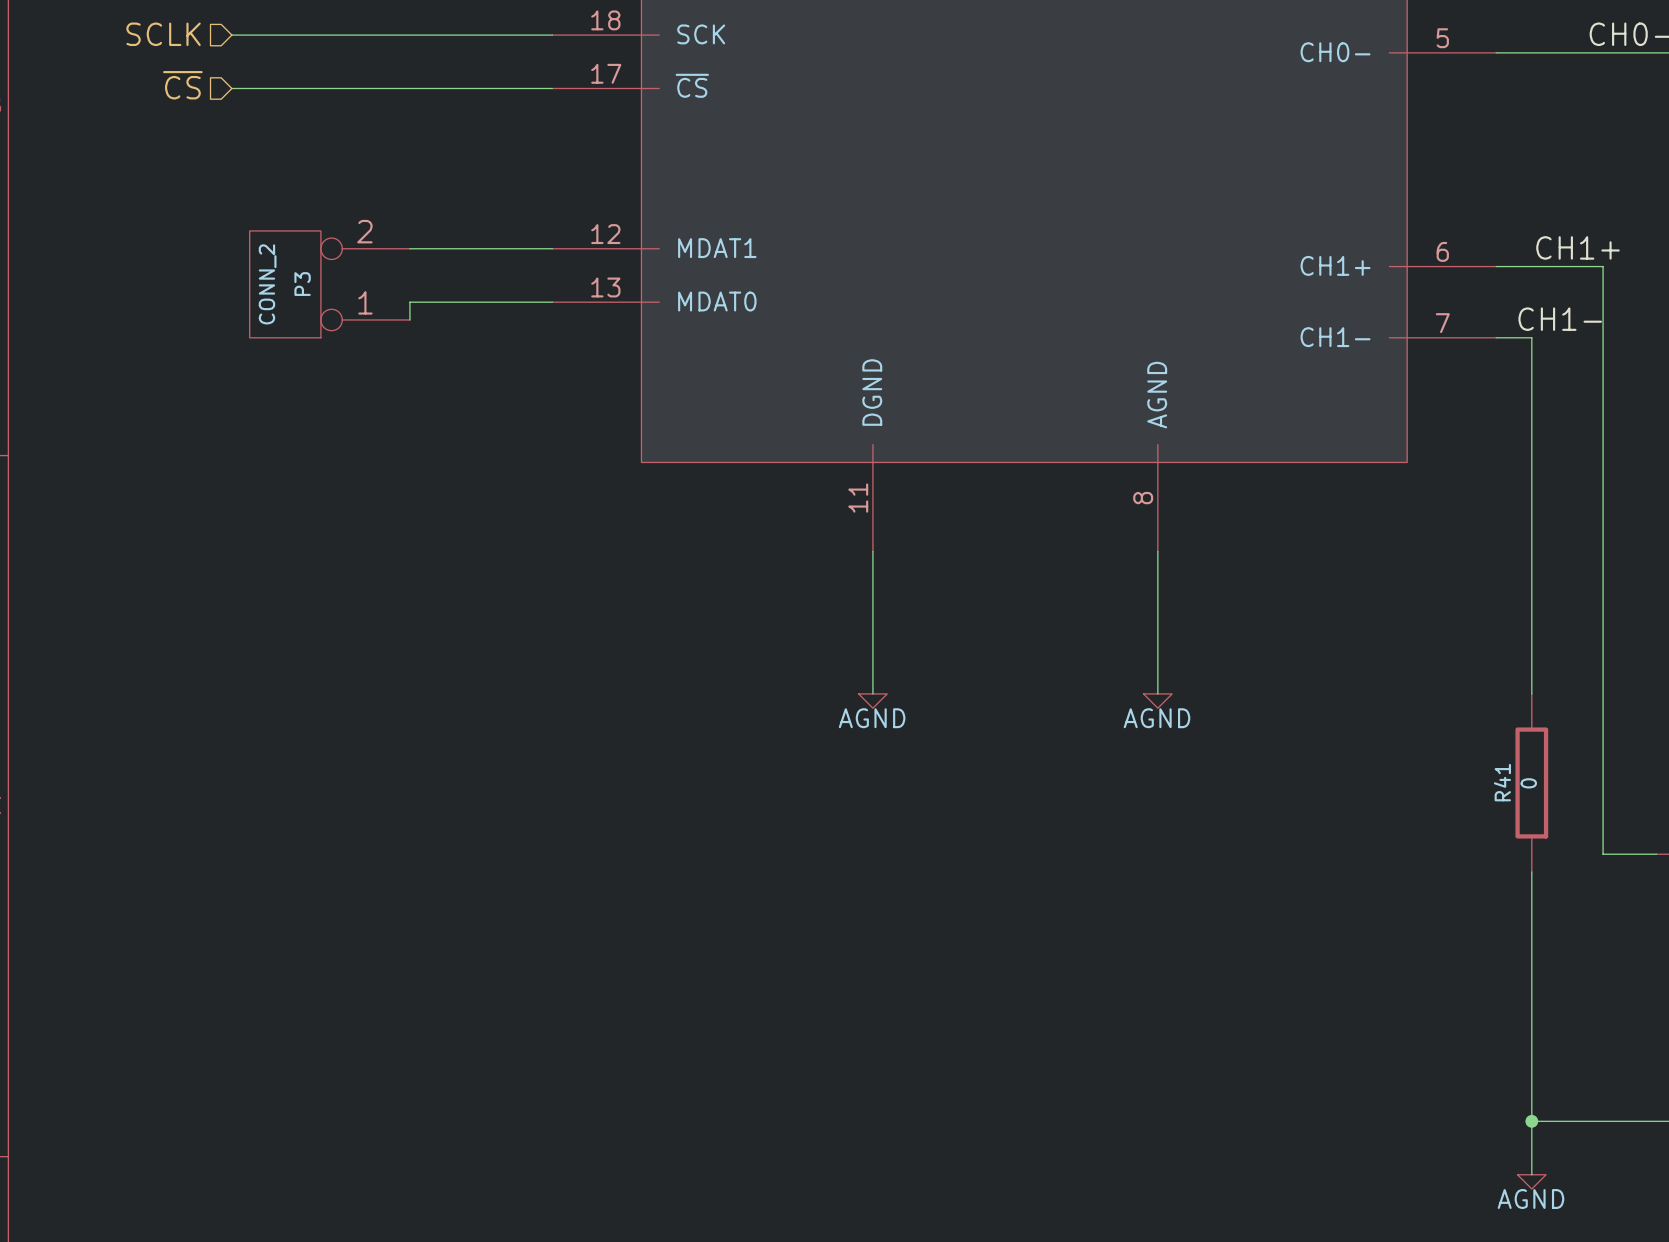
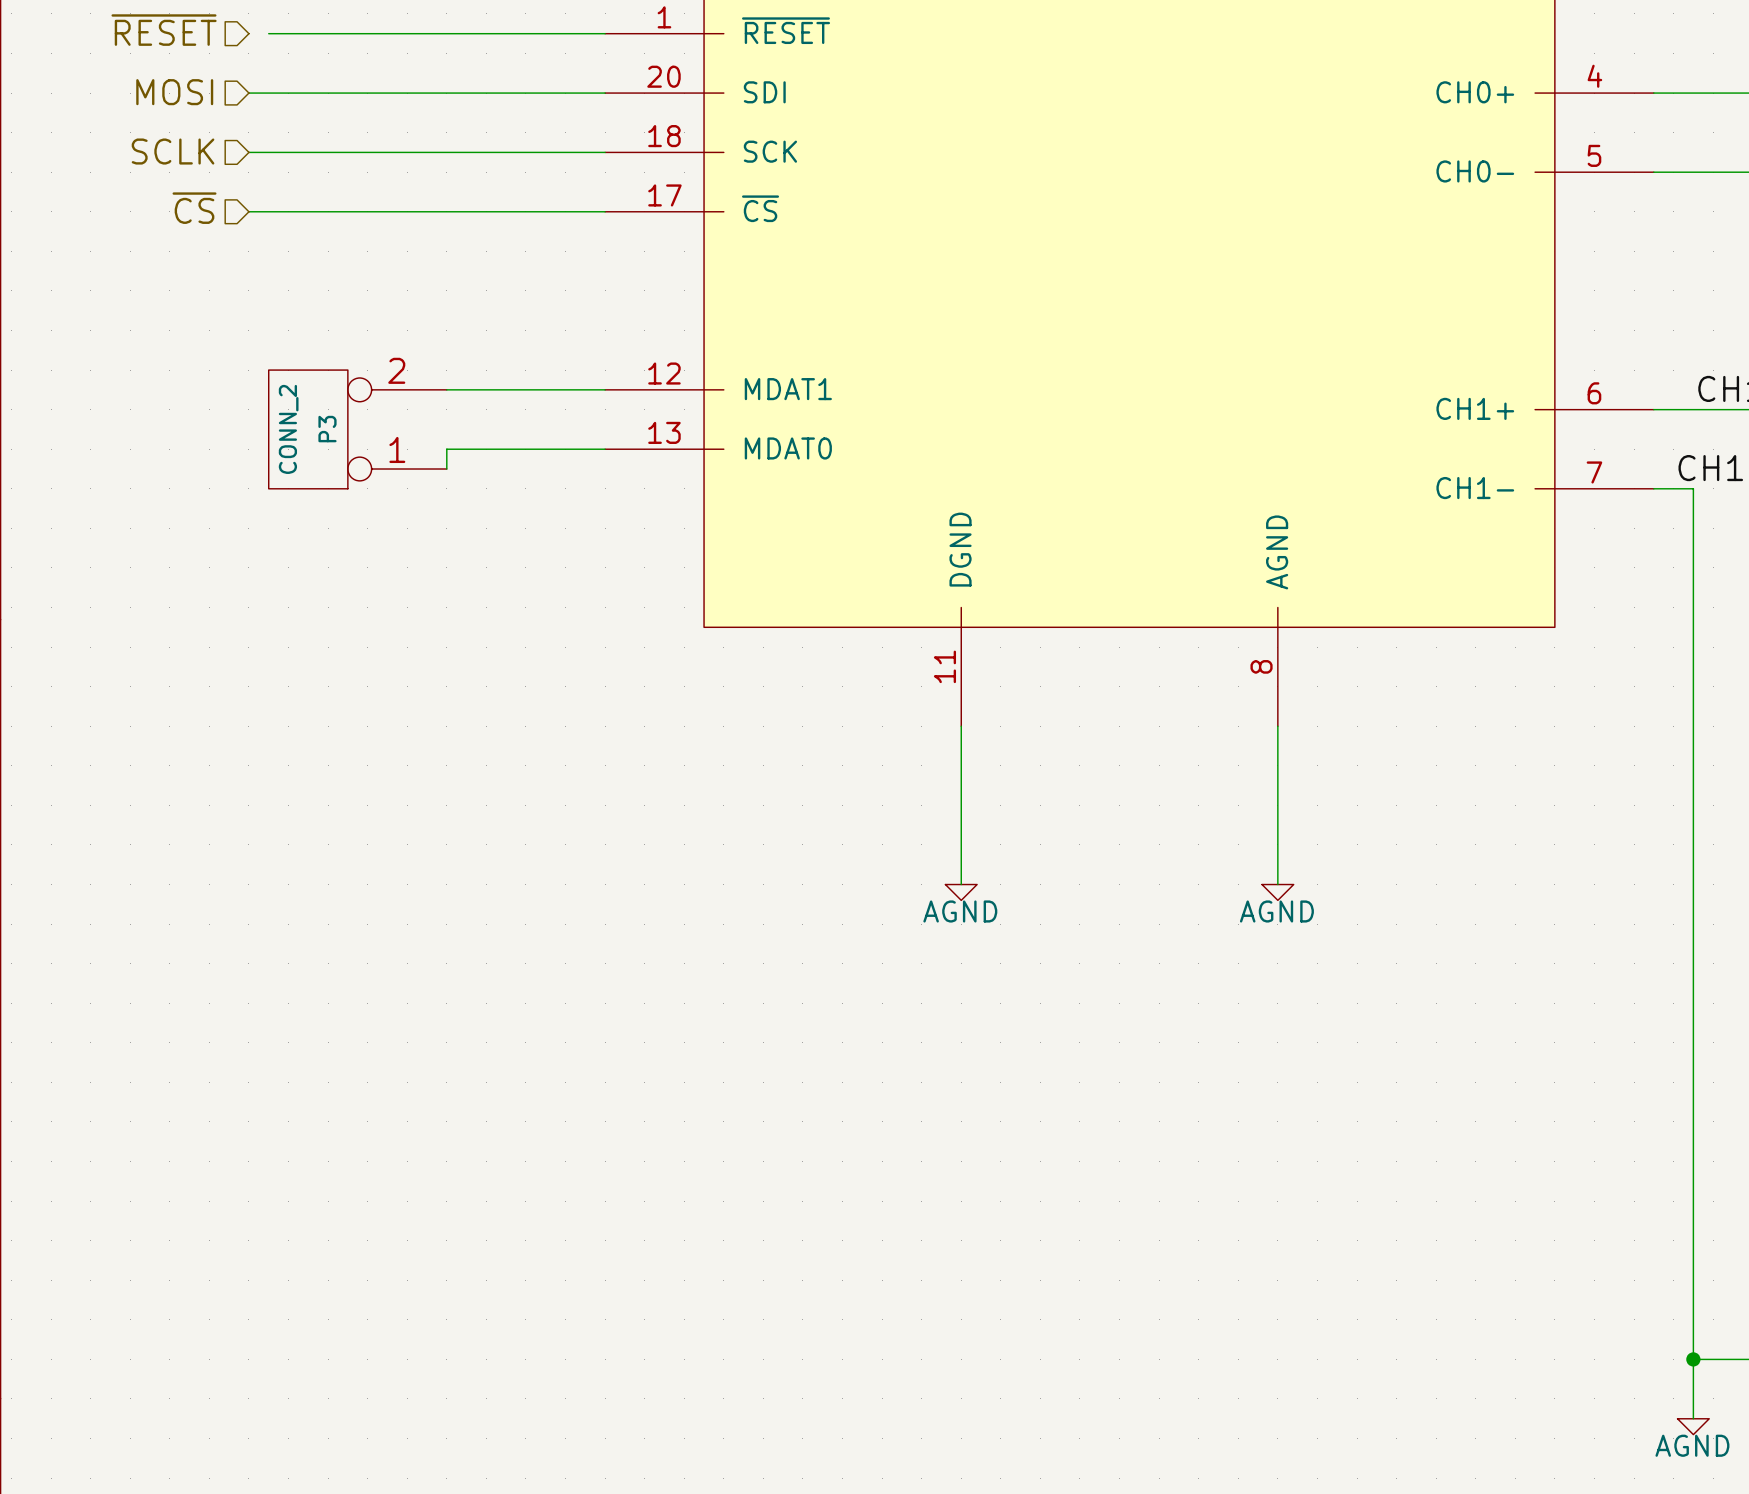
wire: none -> (1693, 884) (1693, 1082)
R41: 0 (1531, 782) -> none

